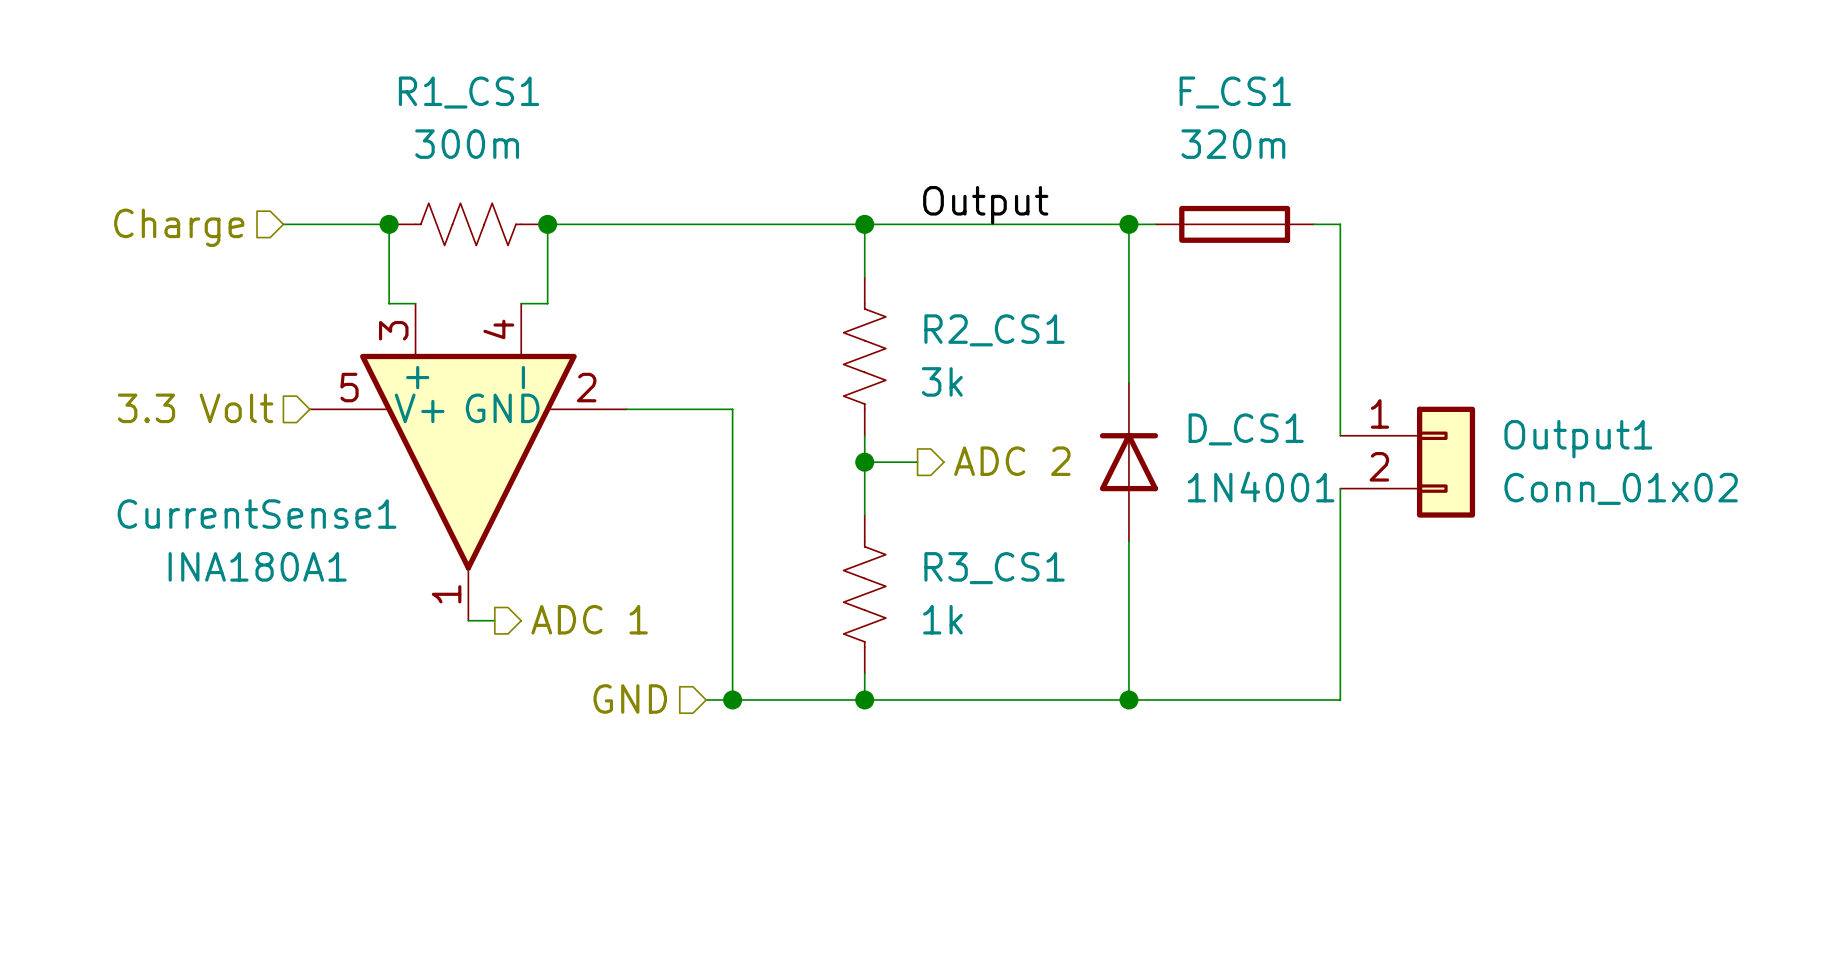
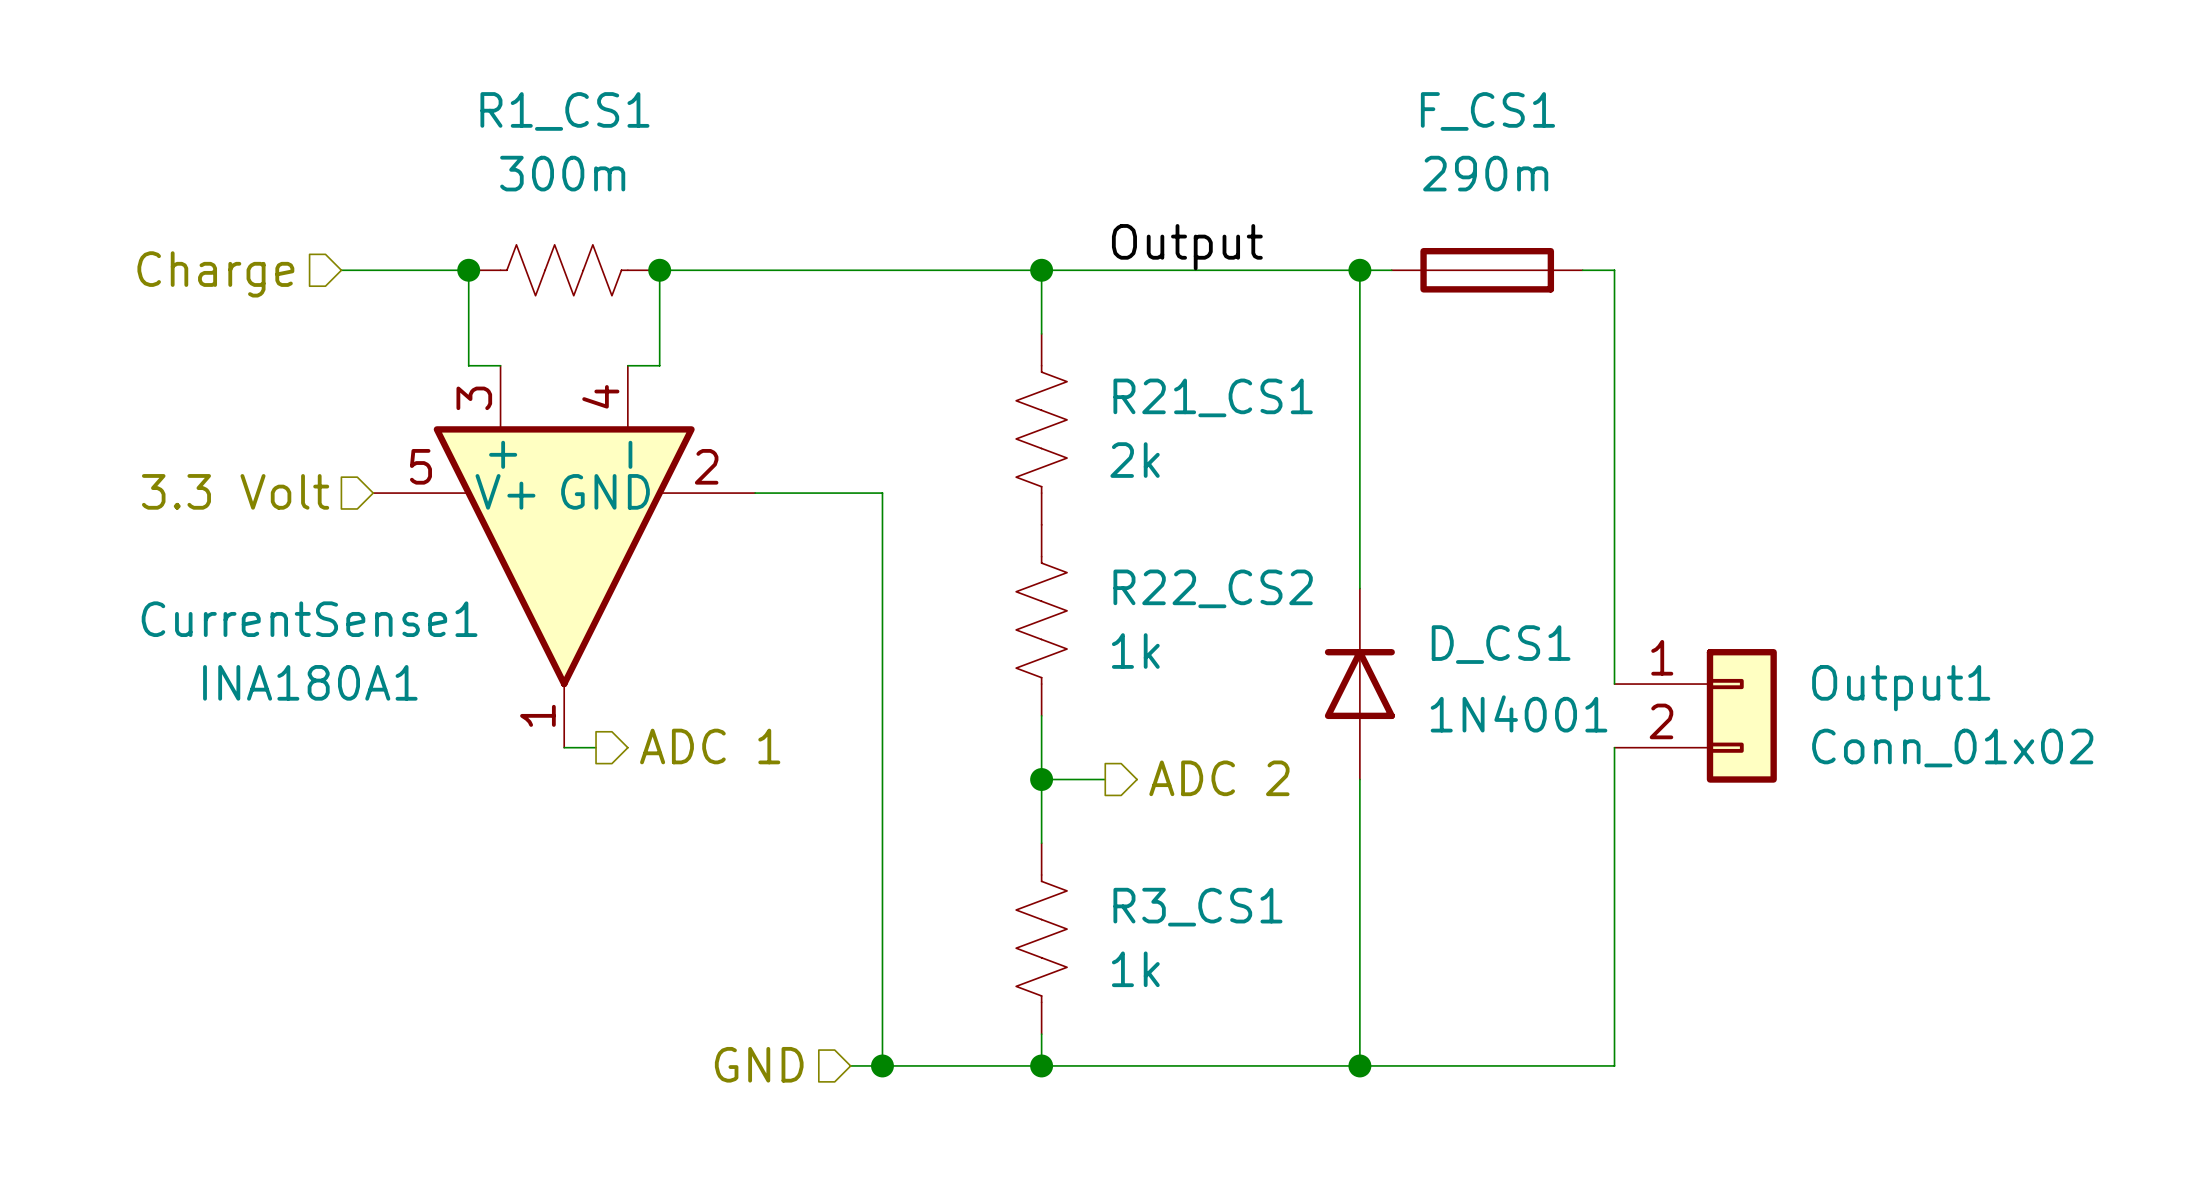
F_CS1 value: 320m (1233, 144) -> 290m (1485, 173)
R2_CS1 name: R2_CS1 (994, 330) -> R21_CS1 (1213, 397)
R2_CS1 value: 3k (942, 381) -> 2k (1135, 460)
wire: (864, 435) (864, 515) -> (1041, 715) (1041, 811)
hierarchical label position: ADC 2 (1012, 461) -> ADC 2 (1219, 778)
wire: (864, 462) (917, 462) -> (1041, 779) (1105, 779)
junction: (864, 462) -> none
D_CS1 position: (1128, 462) -> (1359, 684)
Output1 position: (1407, 462) -> (1695, 715)
R22_CS2: none -> 1k (1041, 620)
wire: (1340, 567) (1340, 620) -> (1614, 524) (1614, 588)
R3_CS1 position: (864, 594) -> (1041, 938)
hierarchical label position: GND (630, 698) -> GND (759, 1064)
wire: (706, 699) (1340, 699) -> (850, 1065) (1614, 1065) (1614, 843)
wire: none -> (882, 843) (882, 1065)
junction: (732, 699) -> none
junction position: (864, 699) -> (1041, 779)
wire: none -> (1359, 843) (1359, 1065)
junction: (1128, 699) -> none
wire: none -> (1041, 1034) (1041, 1065)
junction: none -> (882, 1065)
junction: none -> (1041, 1065)
junction: none -> (1359, 1065)

